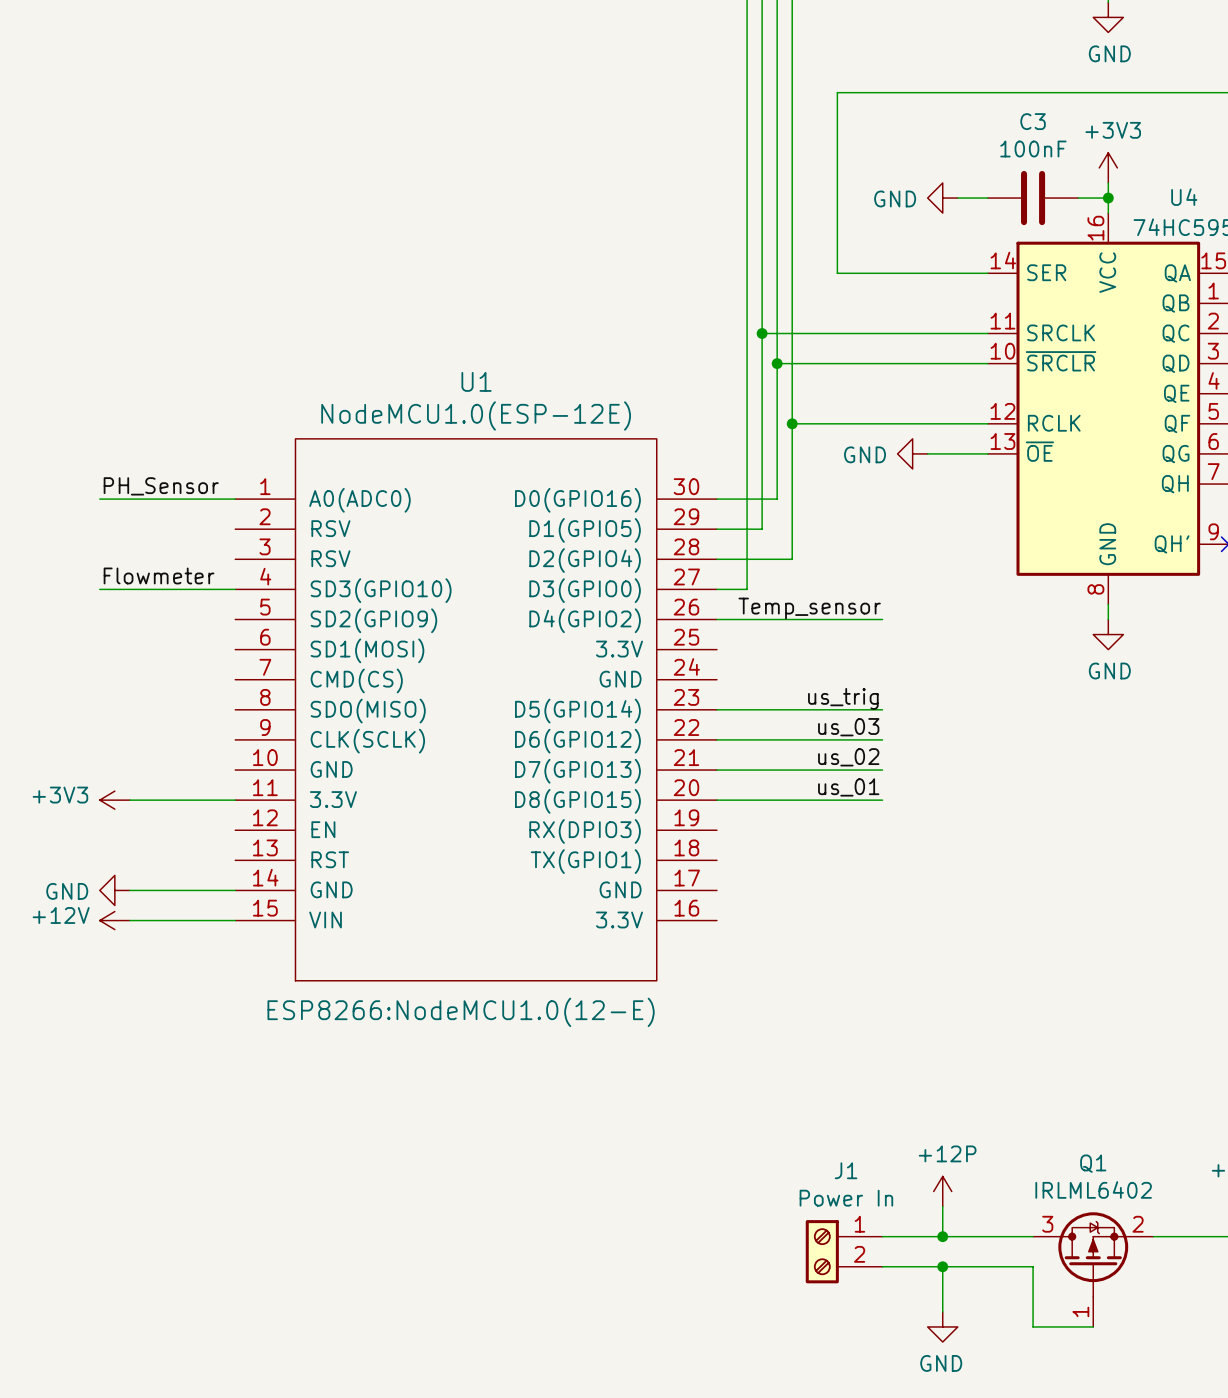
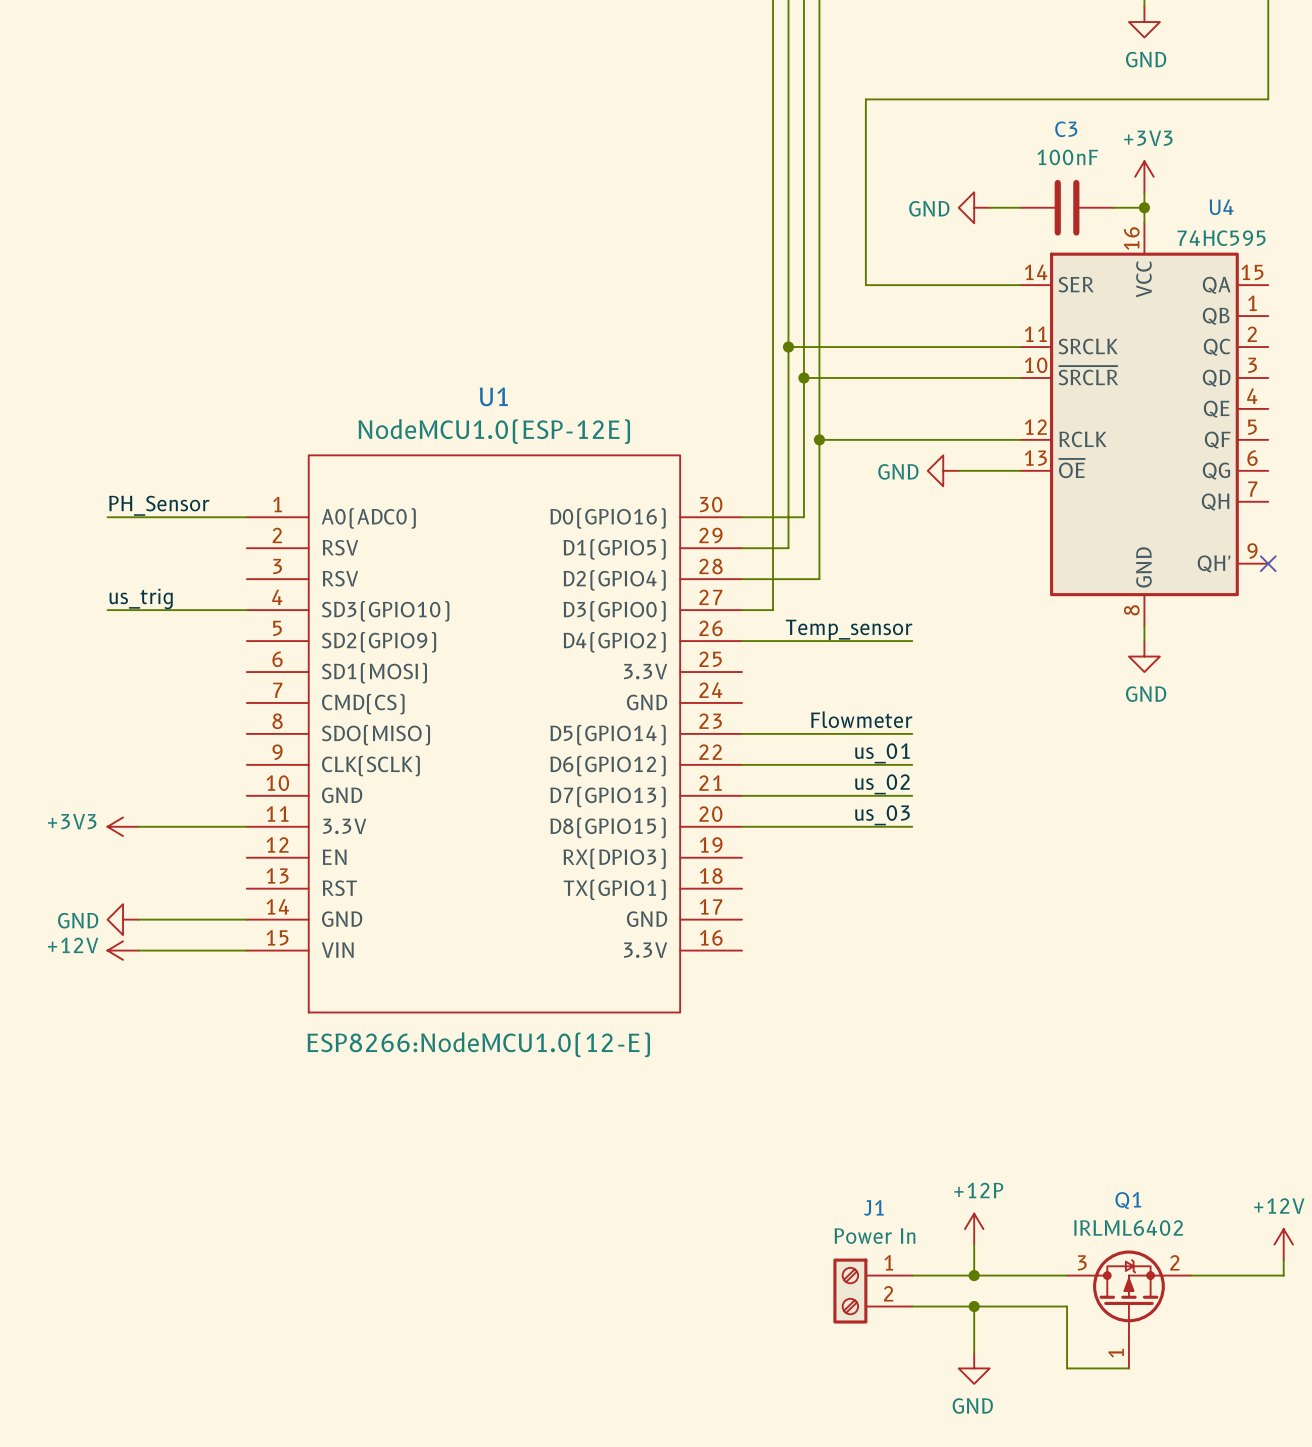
label: Flowmeter (159, 575) -> us_trig (141, 599)
label: us_trig (843, 698) -> Flowmeter (861, 719)
label: us_03 (848, 727) -> us_01 (882, 753)
label: us_01 (848, 787) -> us_03 (882, 815)

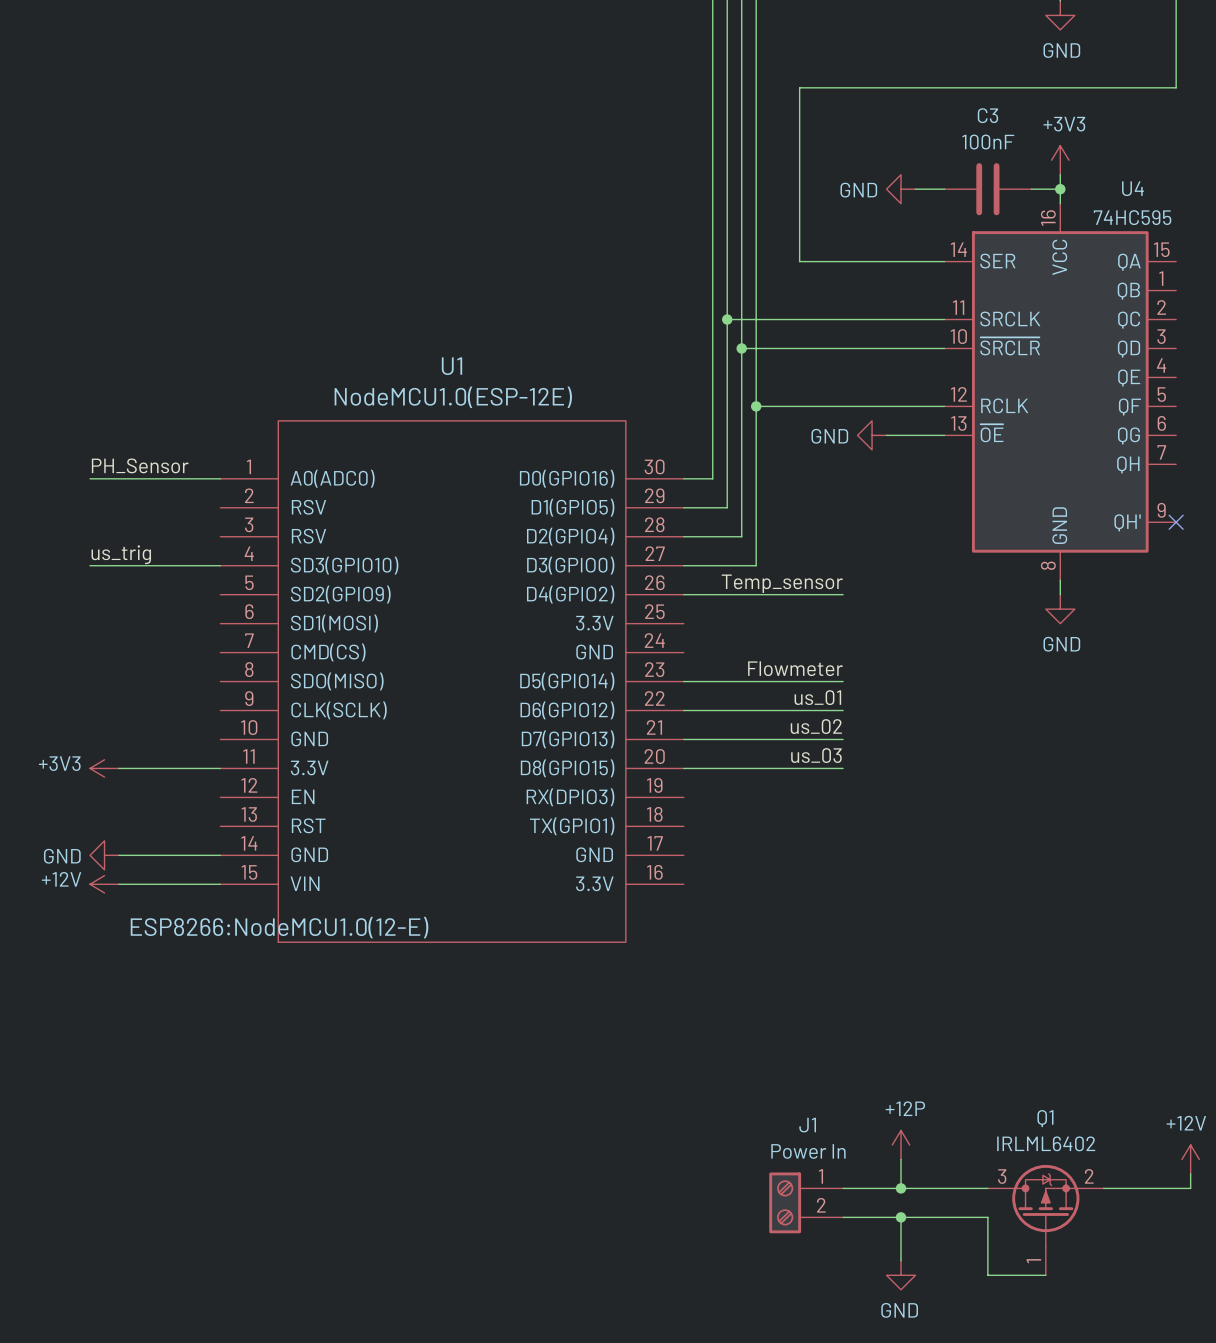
wire: (803, 517) (773, 517) (773, 610) -> (741, 478) (741, 536)
wire: (803, 579) (819, 579) -> (712, 565) (756, 565) (756, 536)
U1 text position: ESP8266:NodeMCU1.0(12-E) (478, 1044) -> ESP8266:NodeMCU1.0(12-E) (279, 927)

